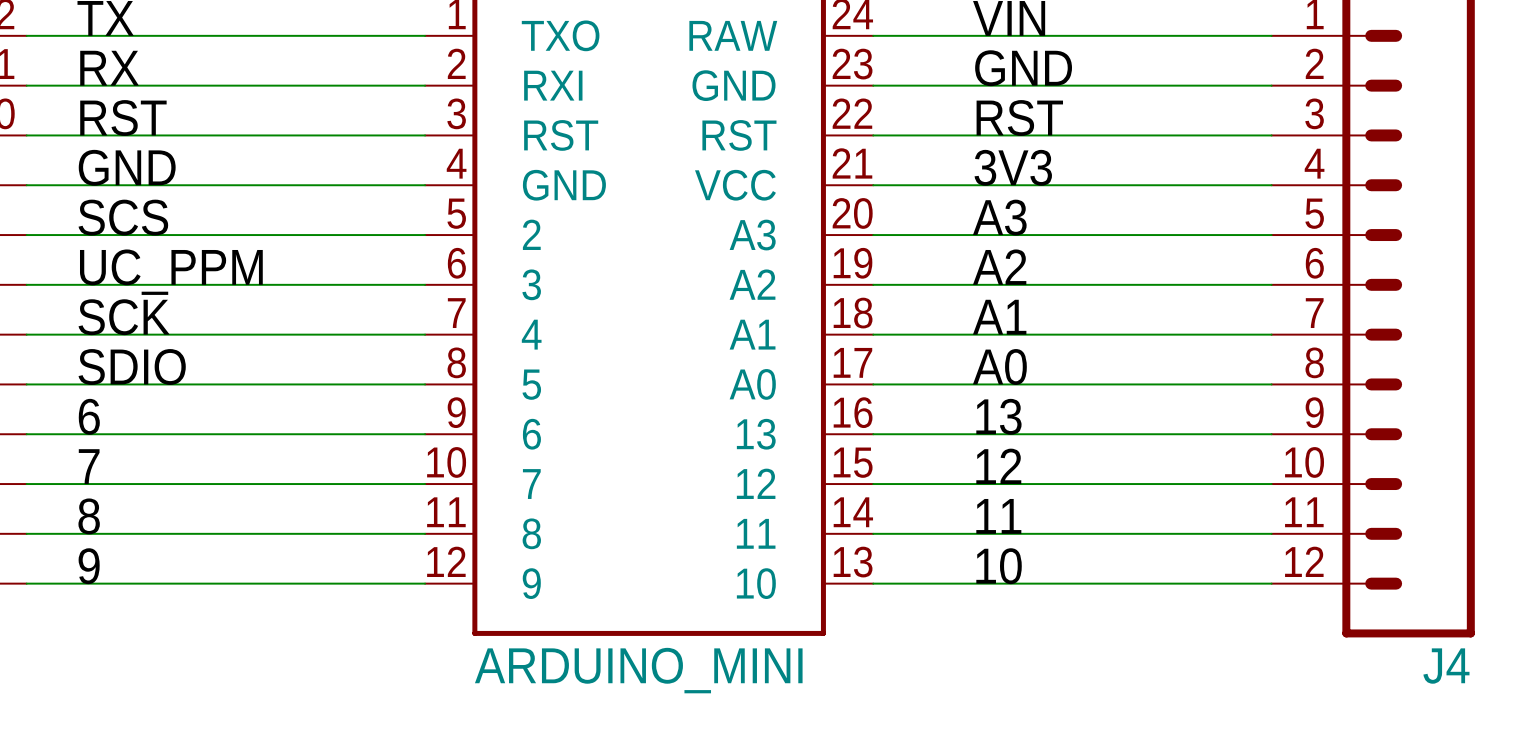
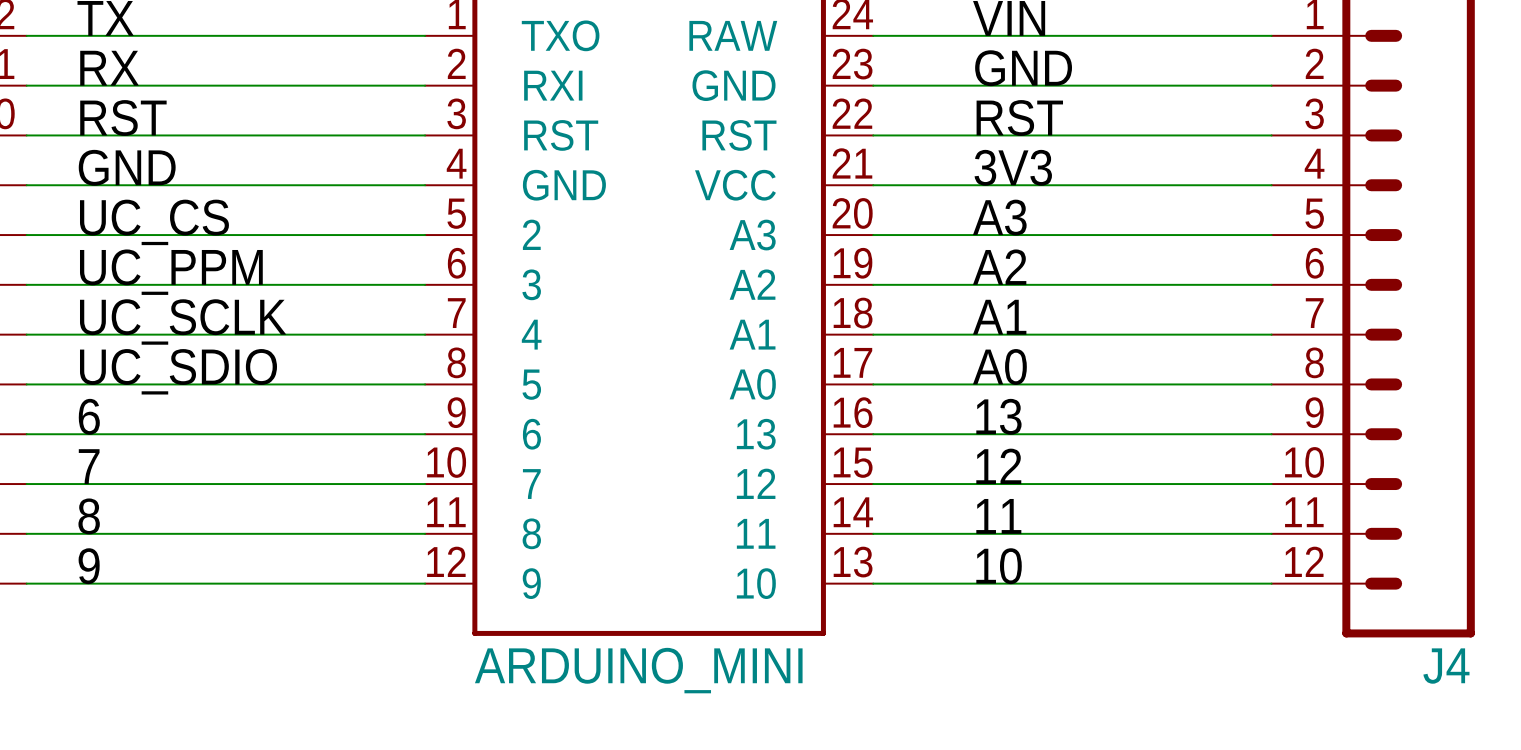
label: SCS (123, 217) -> UC_CS (154, 222)
label: SCK (124, 317) -> UC_SCLK (183, 321)
label: SDIO (132, 366) -> UC_SDIO (178, 371)

